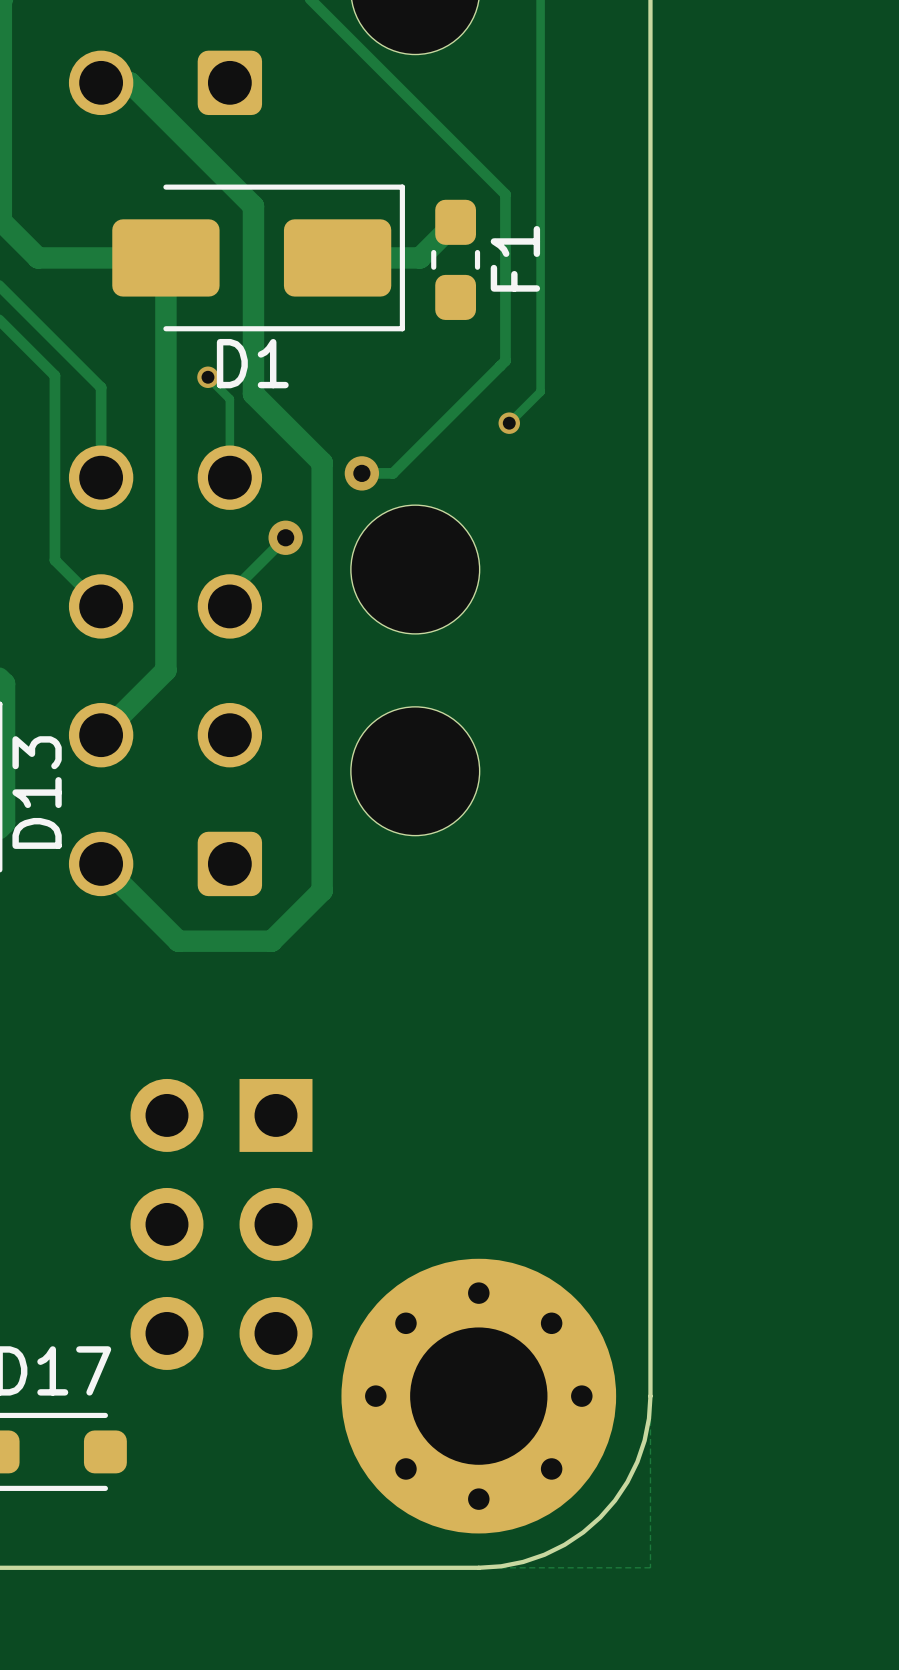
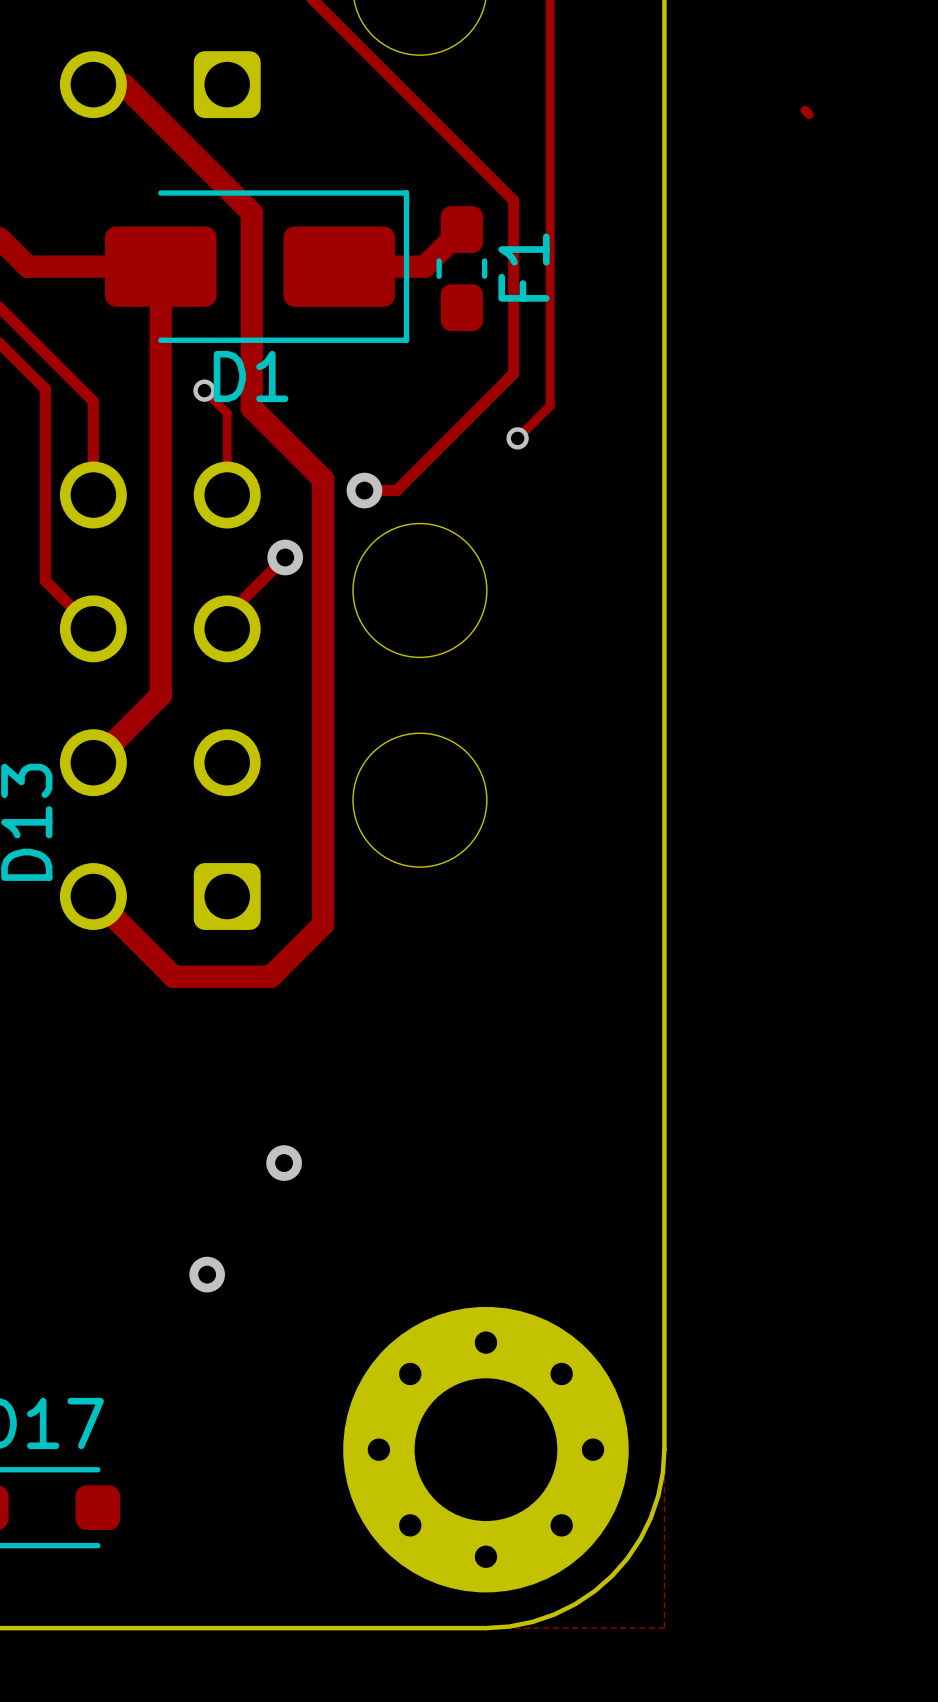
track: none -> (804, 110) (809, 114)
via: none -> (284, 1163)
part: (221, 1224) -> none
via: none -> (207, 1274)

